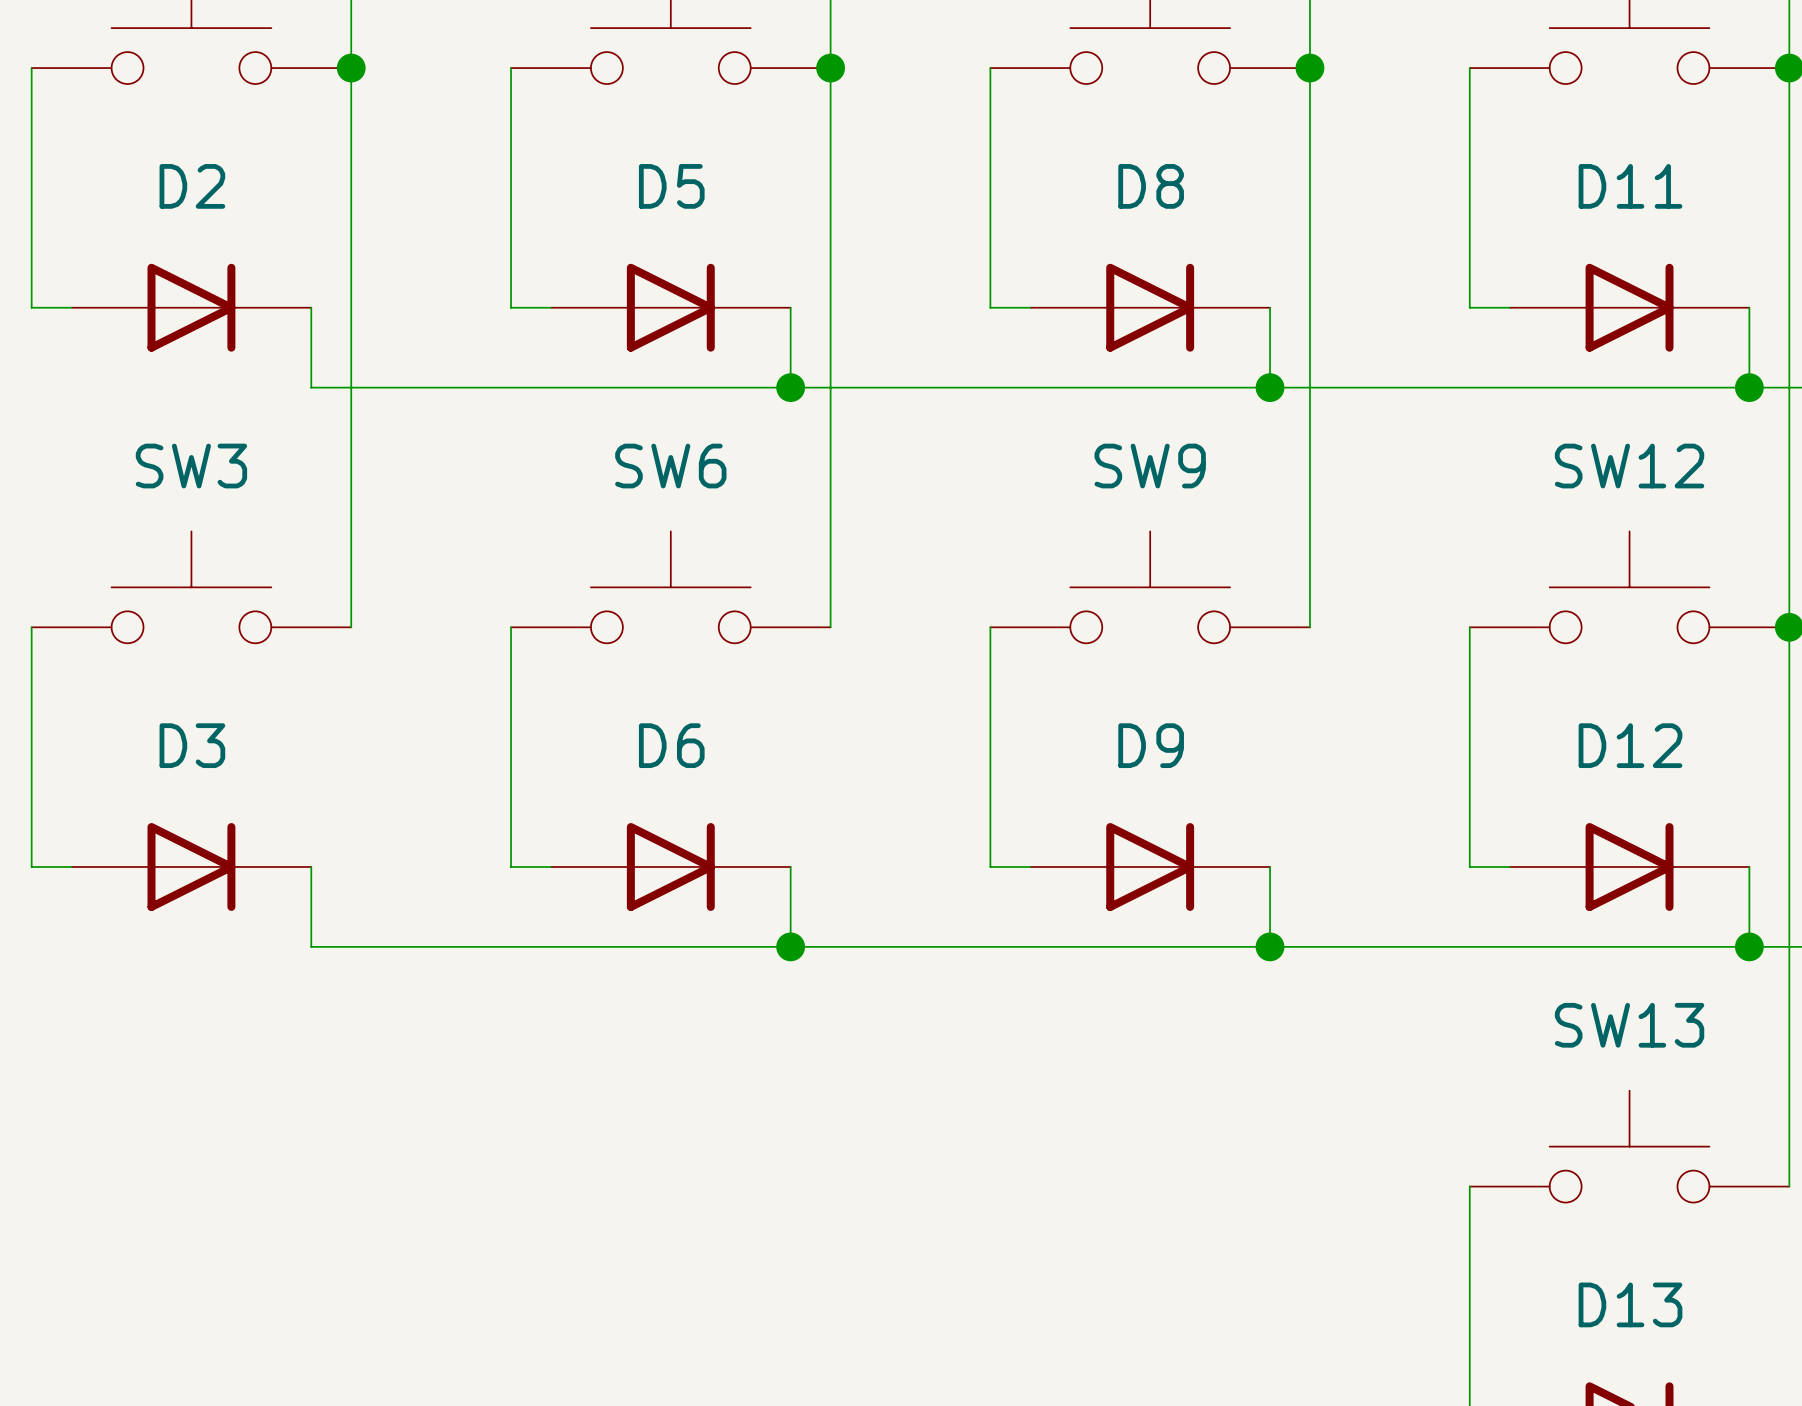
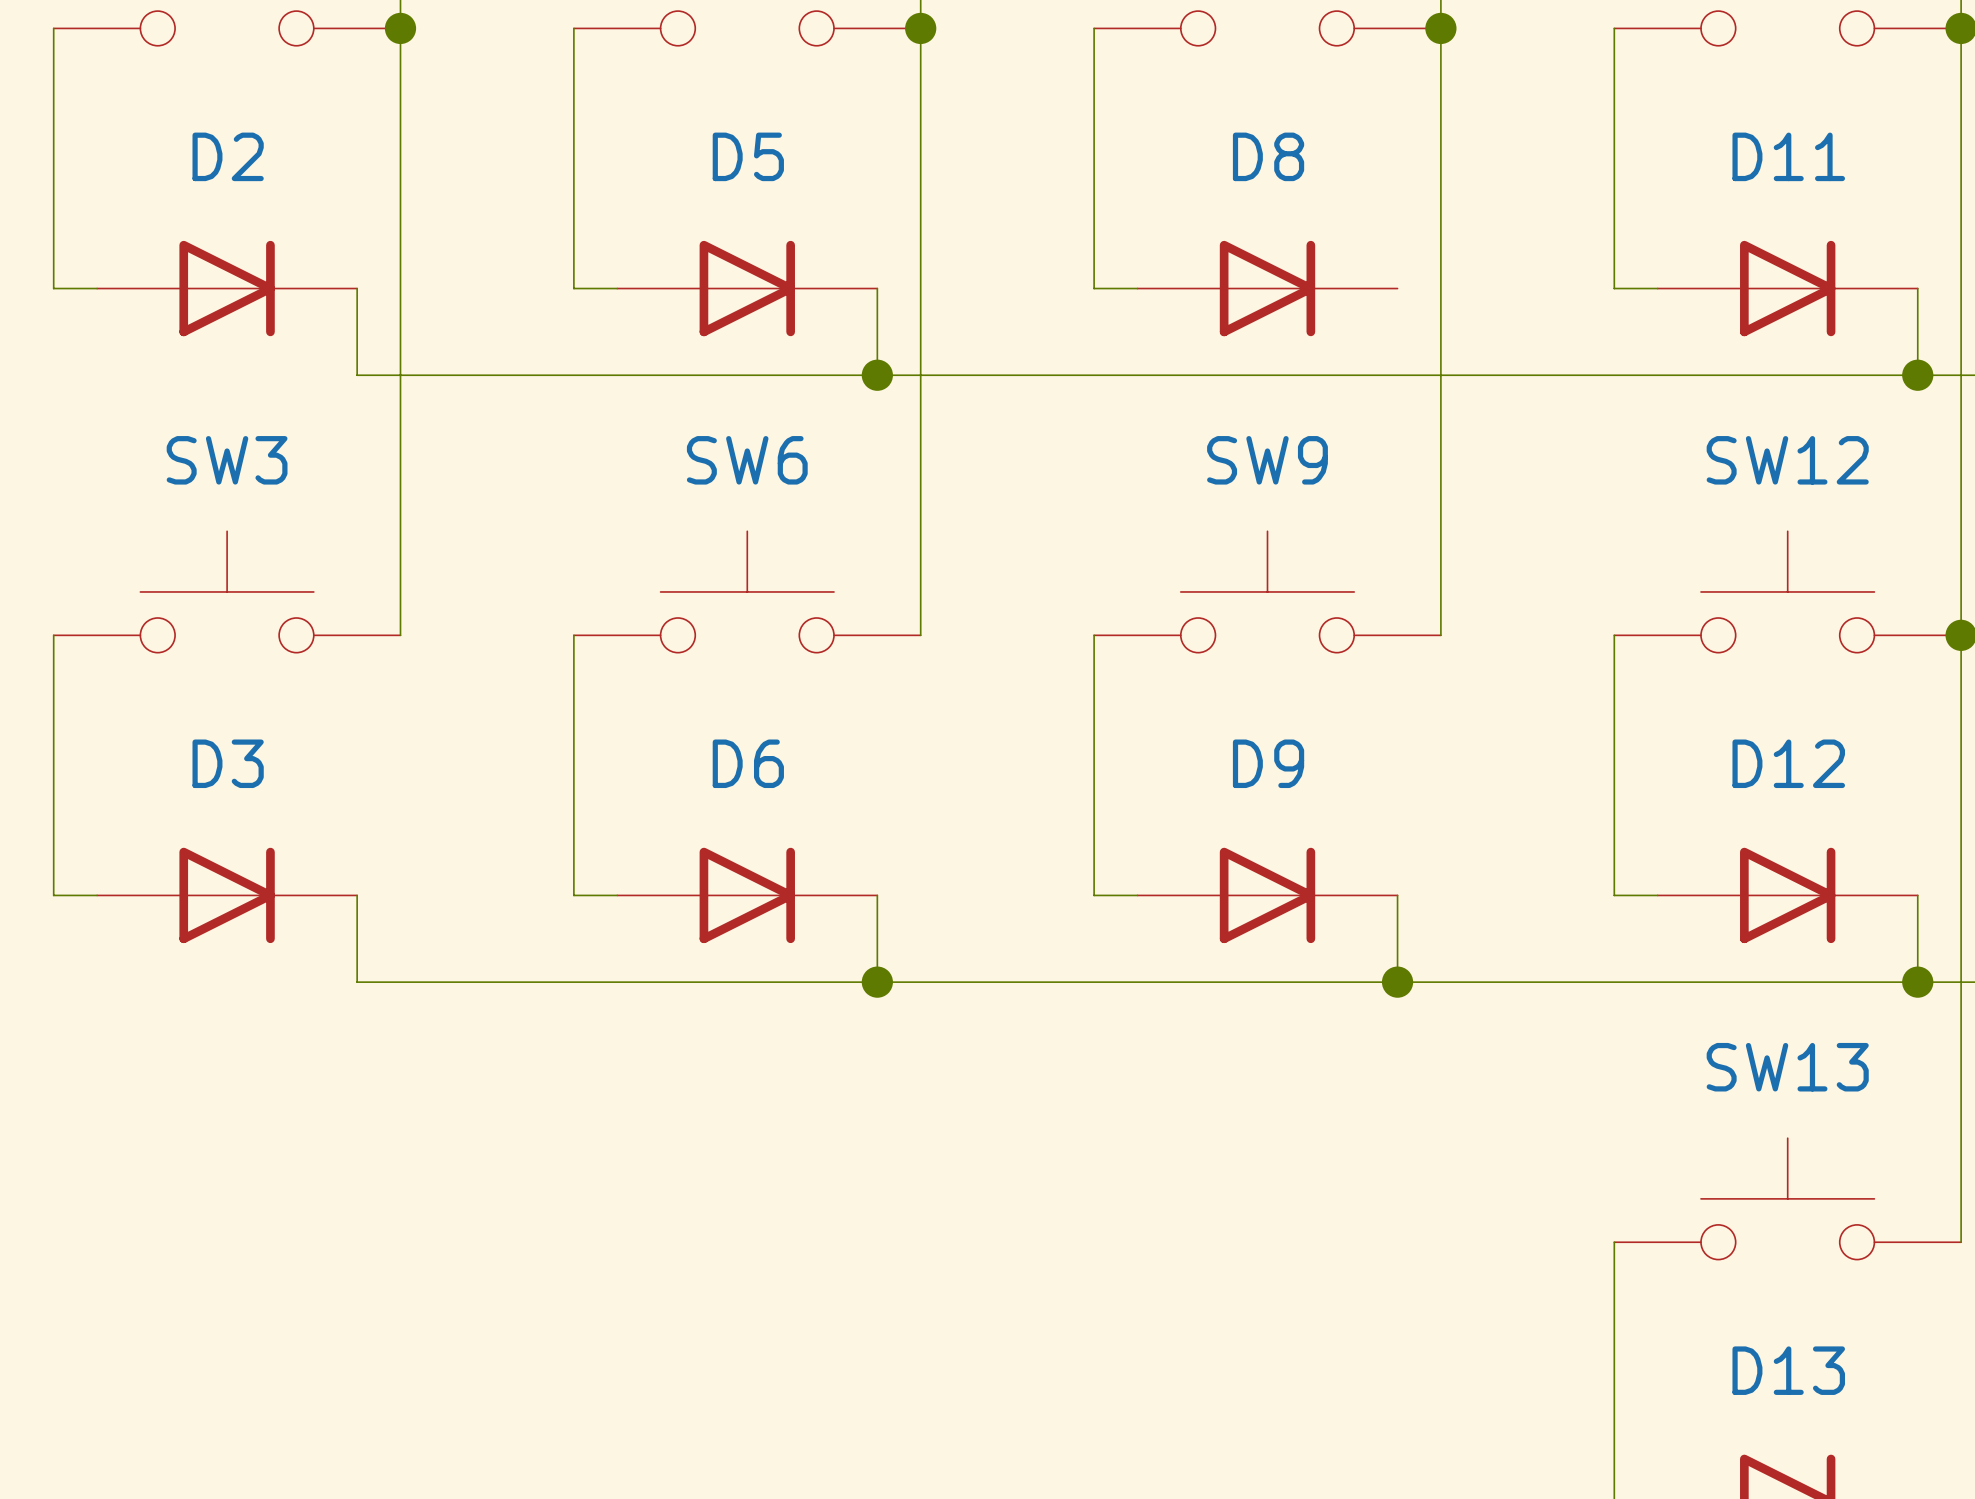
wire: (1270, 307) (1270, 387) -> none
junction: (1270, 387) -> none

